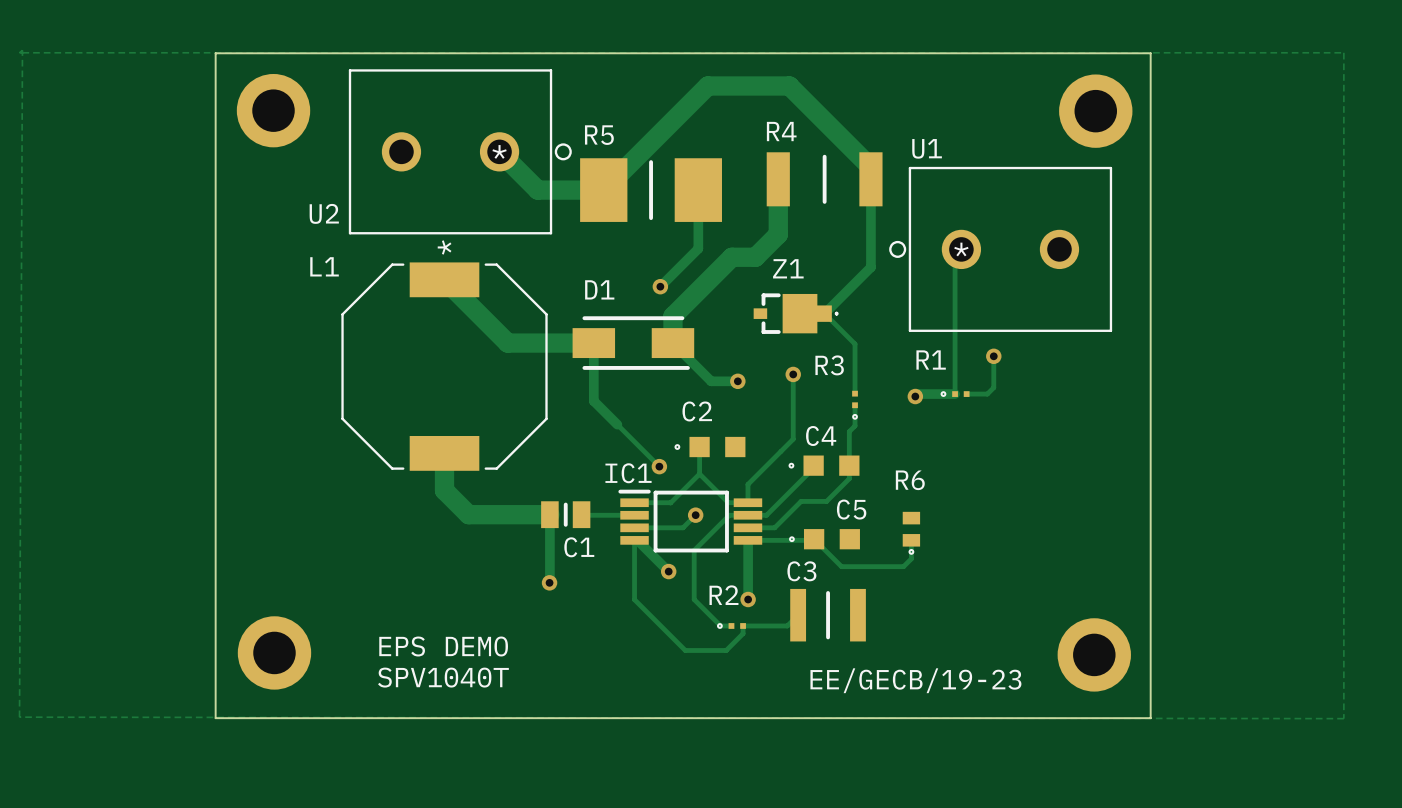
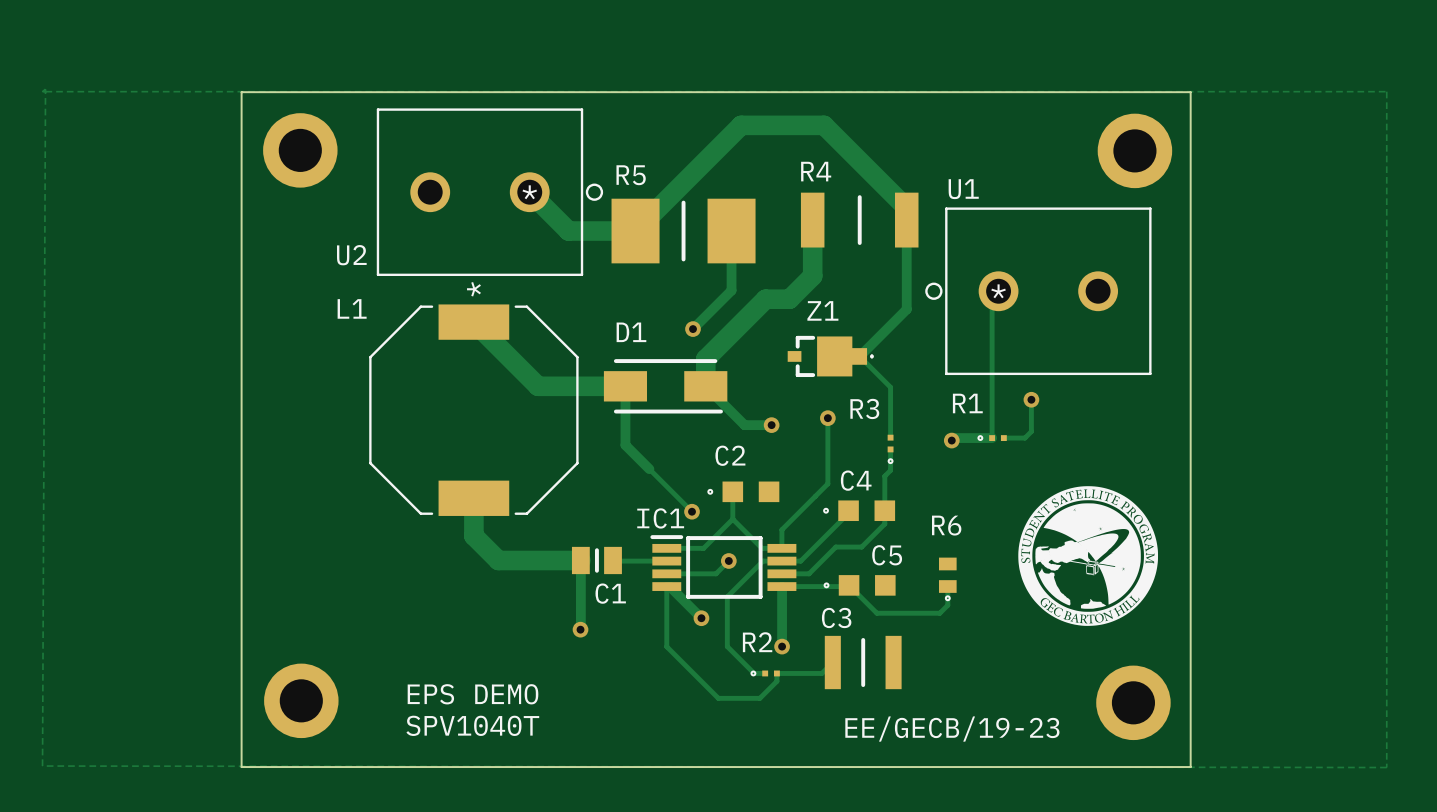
drawing: none -> [1018, 486, 1159, 626]

